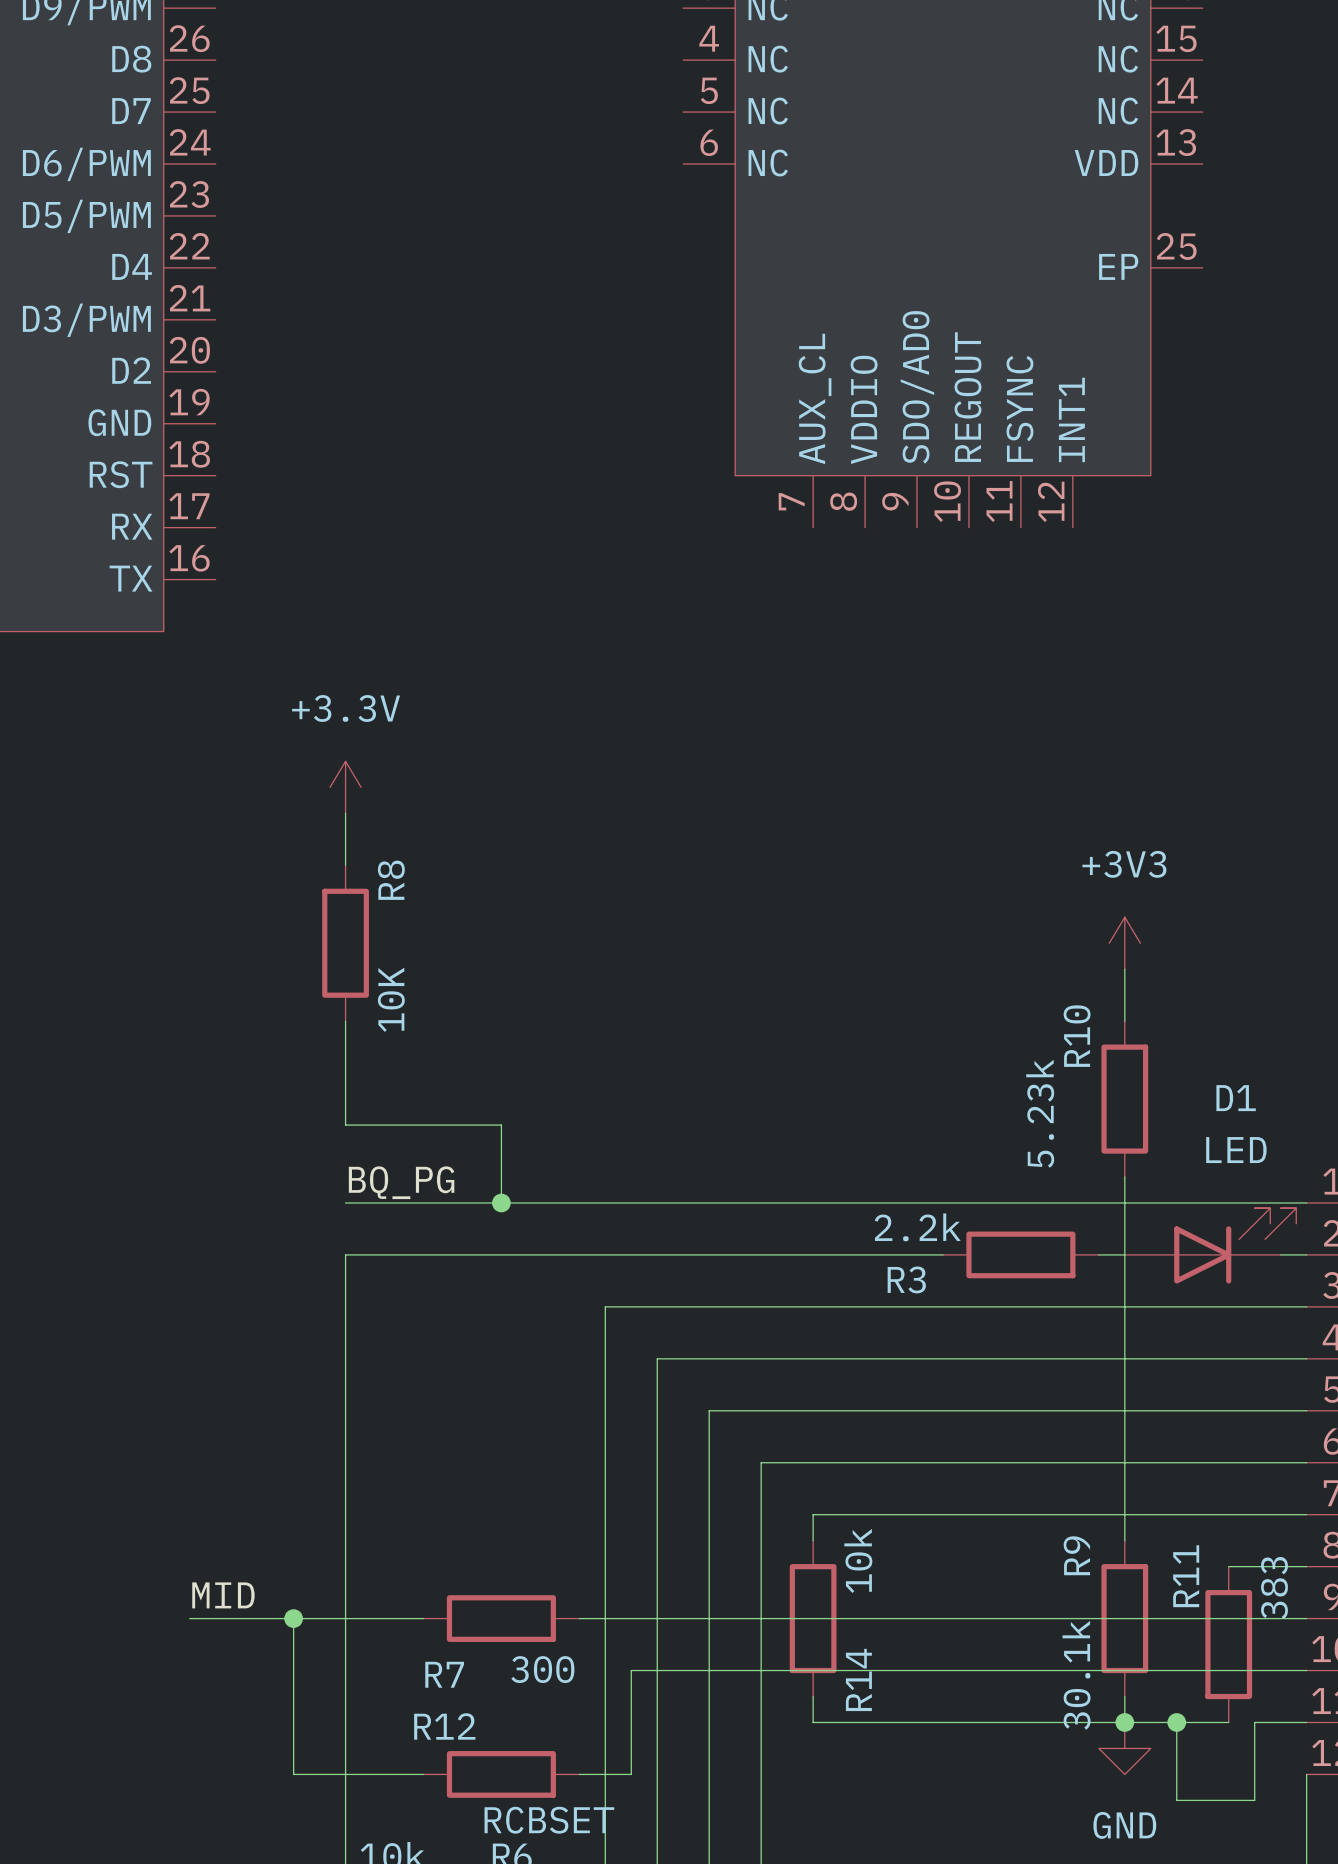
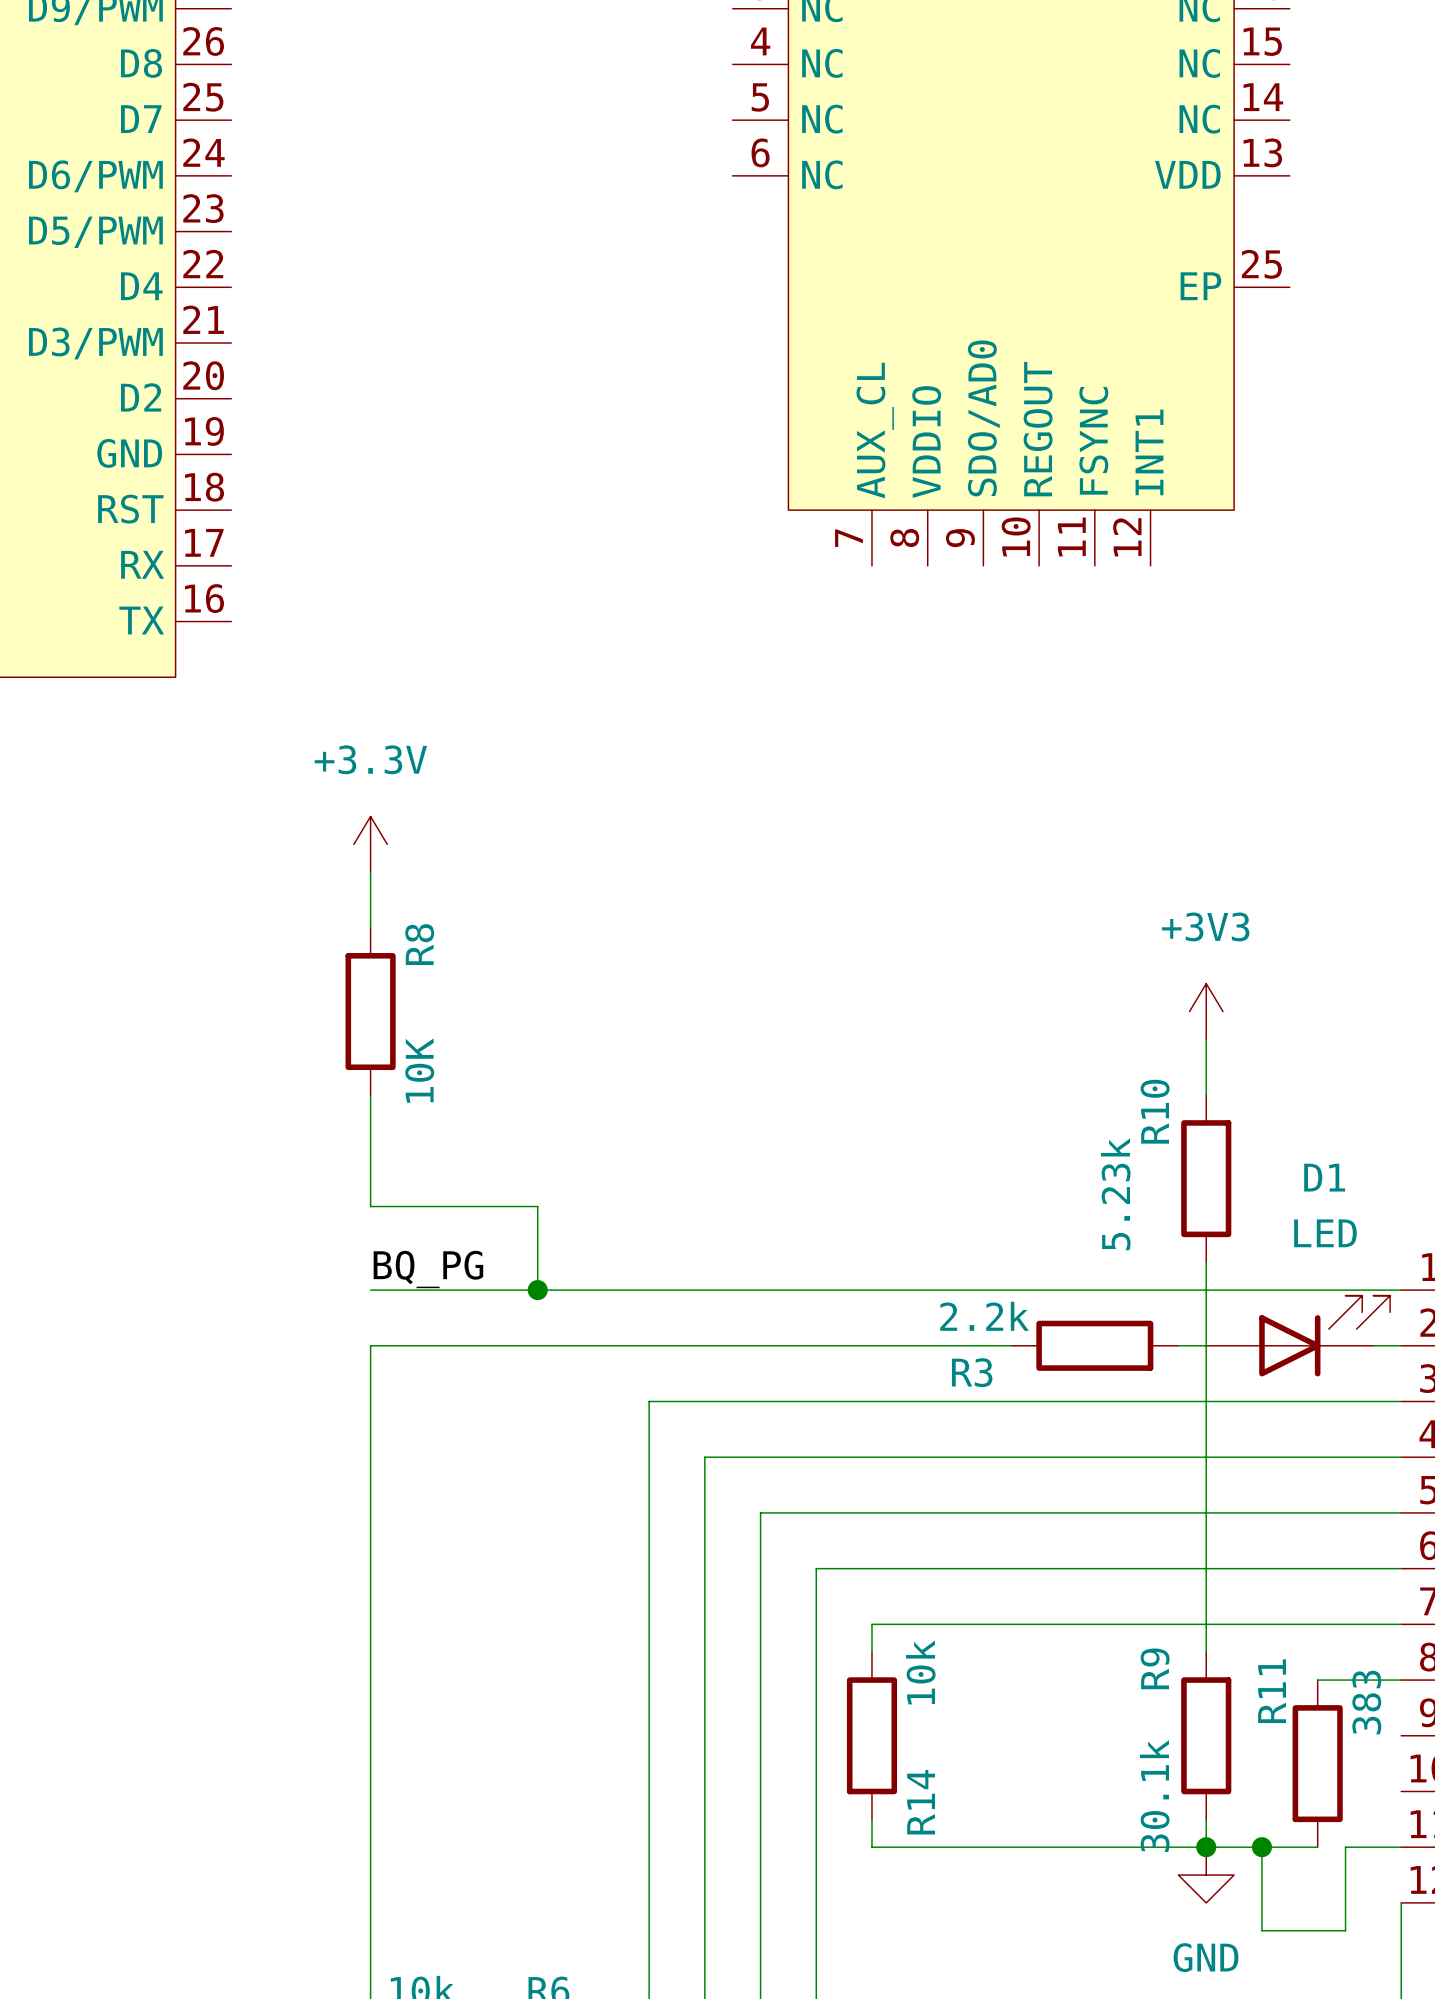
label: MID (223, 1595) -> none
wire: (189, 1618) (423, 1618) -> none
wire: (293, 1618) (293, 1774) (423, 1774) -> none
junction: (293, 1618) -> none
R7: 300 (501, 1618) -> none
wire: (579, 1618) (1306, 1618) -> none
wire: (1306, 1670) (631, 1670) (631, 1774) (579, 1774) -> none
R12: RCBSET (501, 1774) -> none

